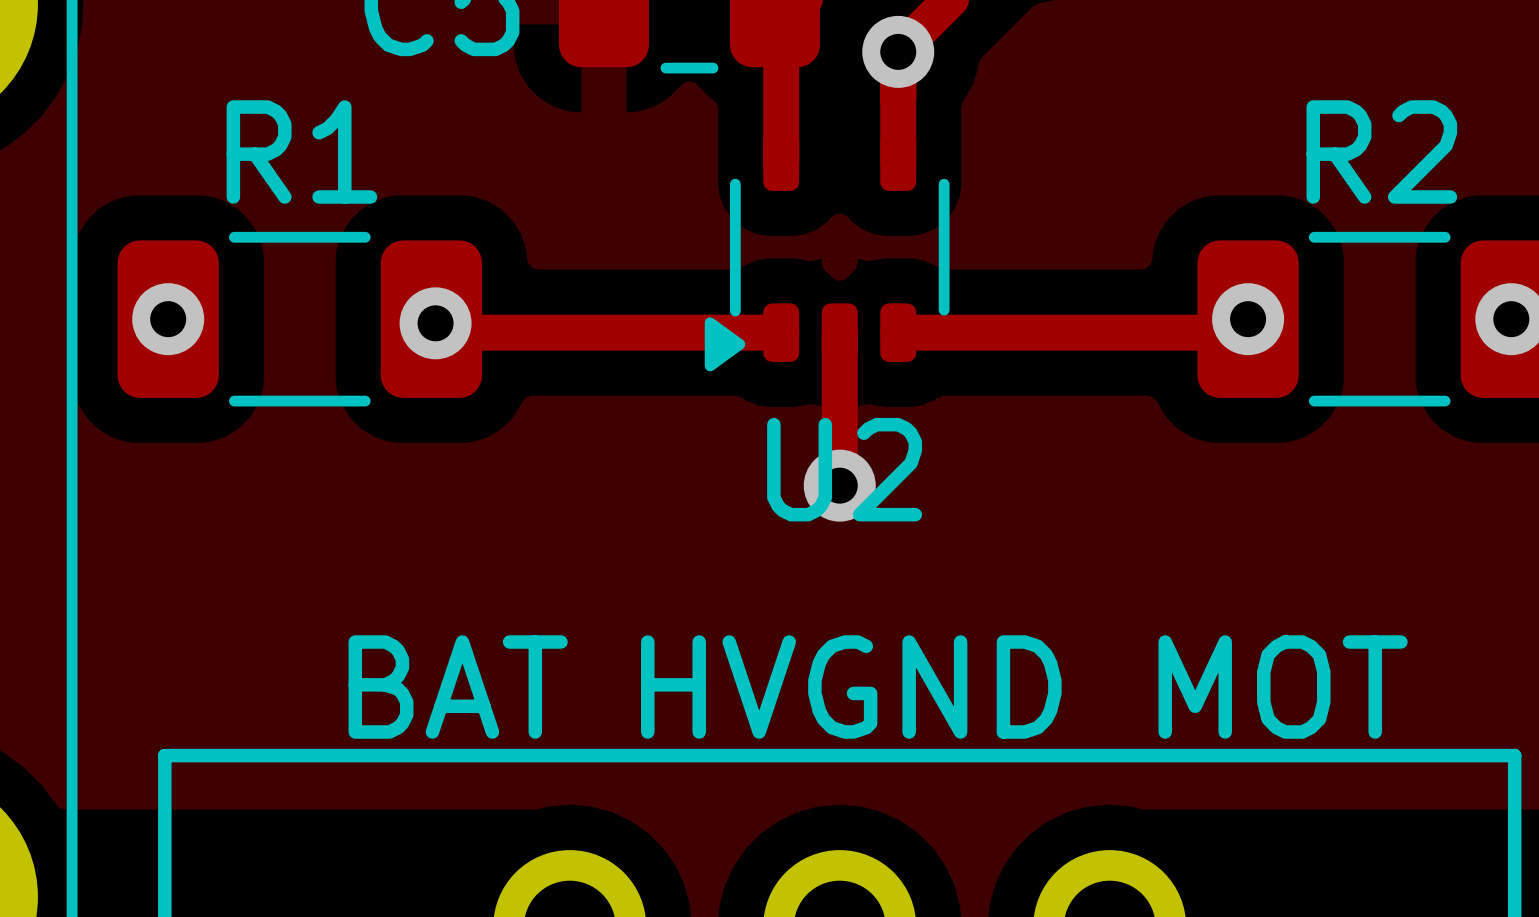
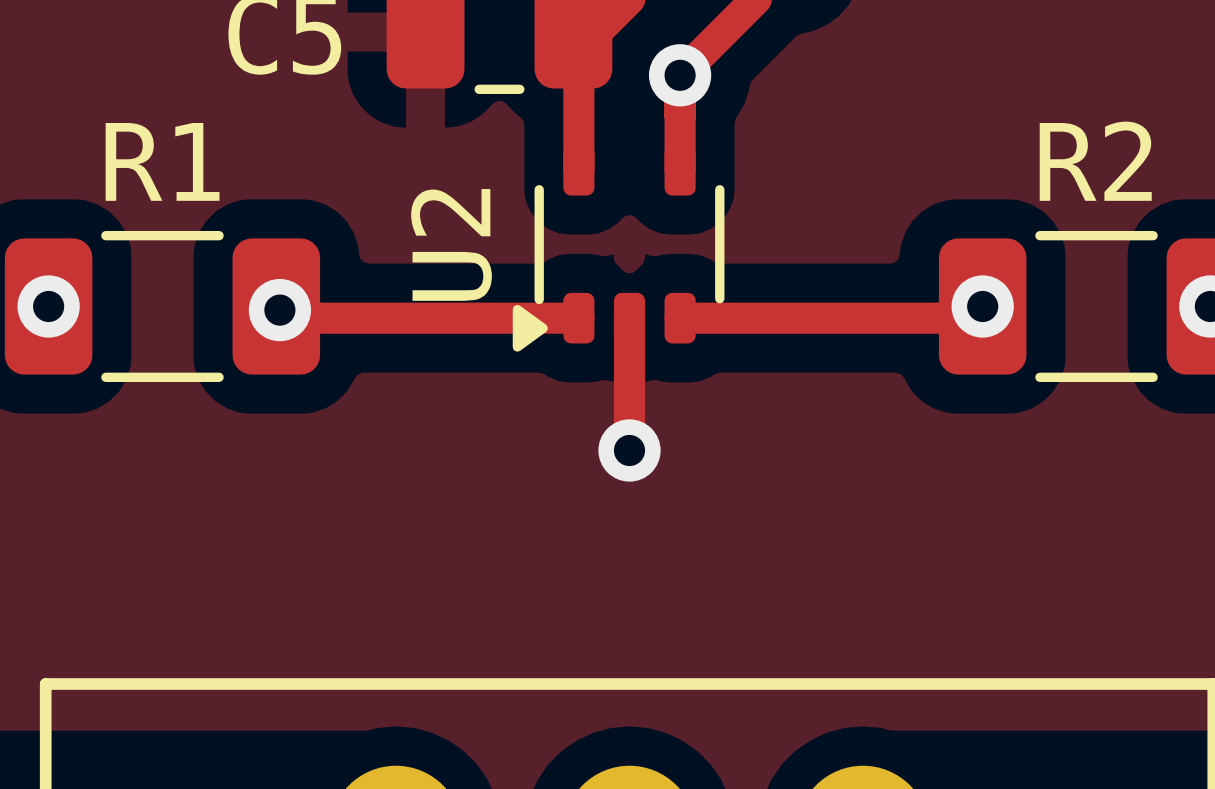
U2 name rotation: 0° (844, 469) -> 90° counterclockwise (451, 244)
U2 name position: U2 (844, 469) -> U2 (451, 244)
text: BAT (458, 687) -> none
text: HVGND (851, 687) -> none
text: MOT (1283, 687) -> none

